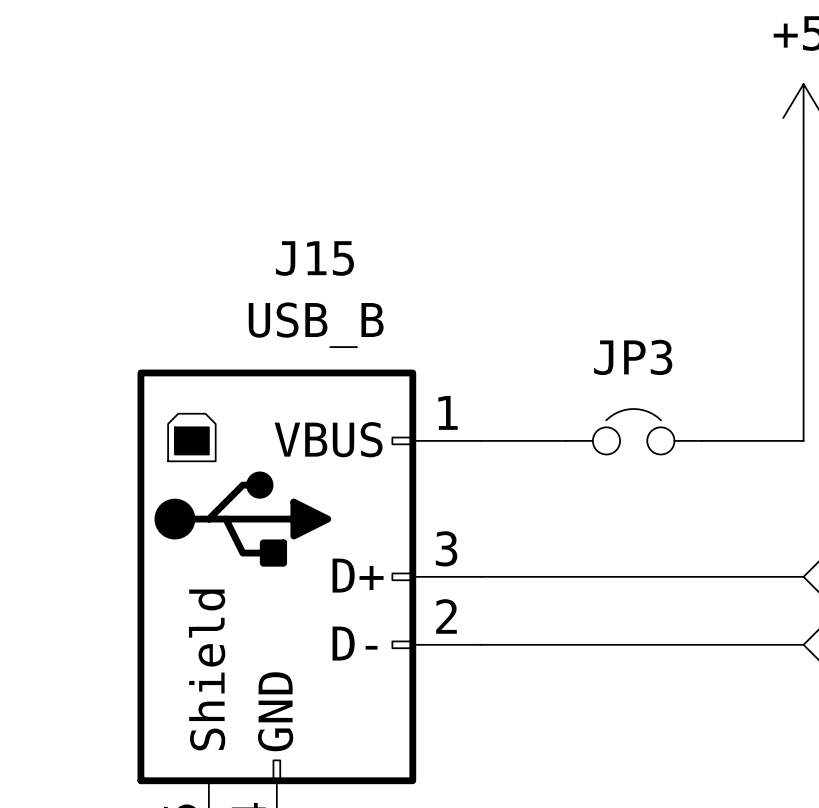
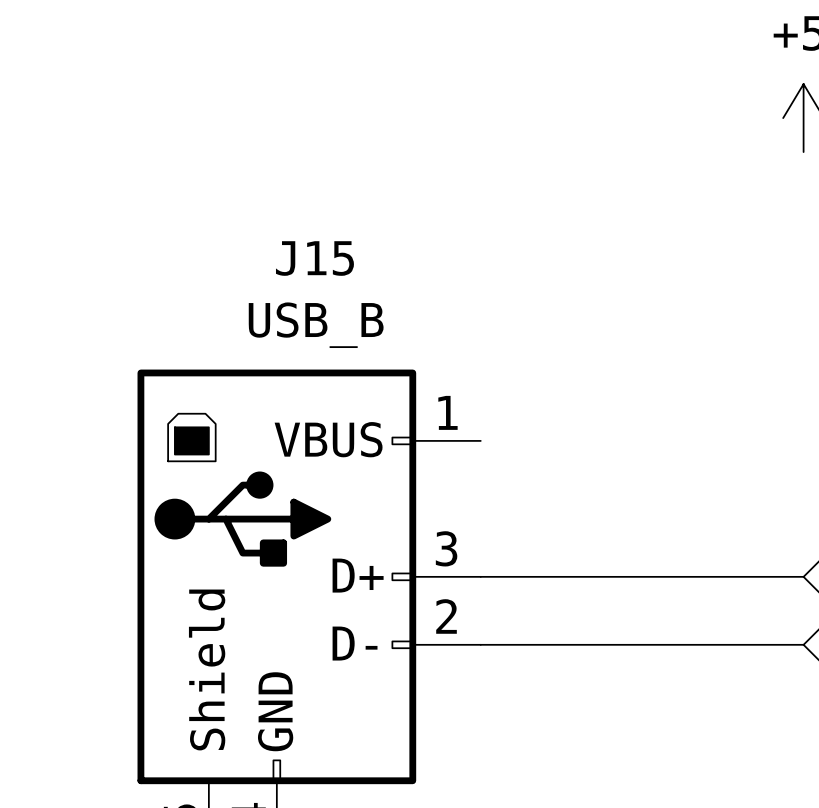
wire: (803, 152) (803, 440) (701, 440) -> none
JP3: (633, 431) -> none
wire: (480, 440) (565, 440) -> none

